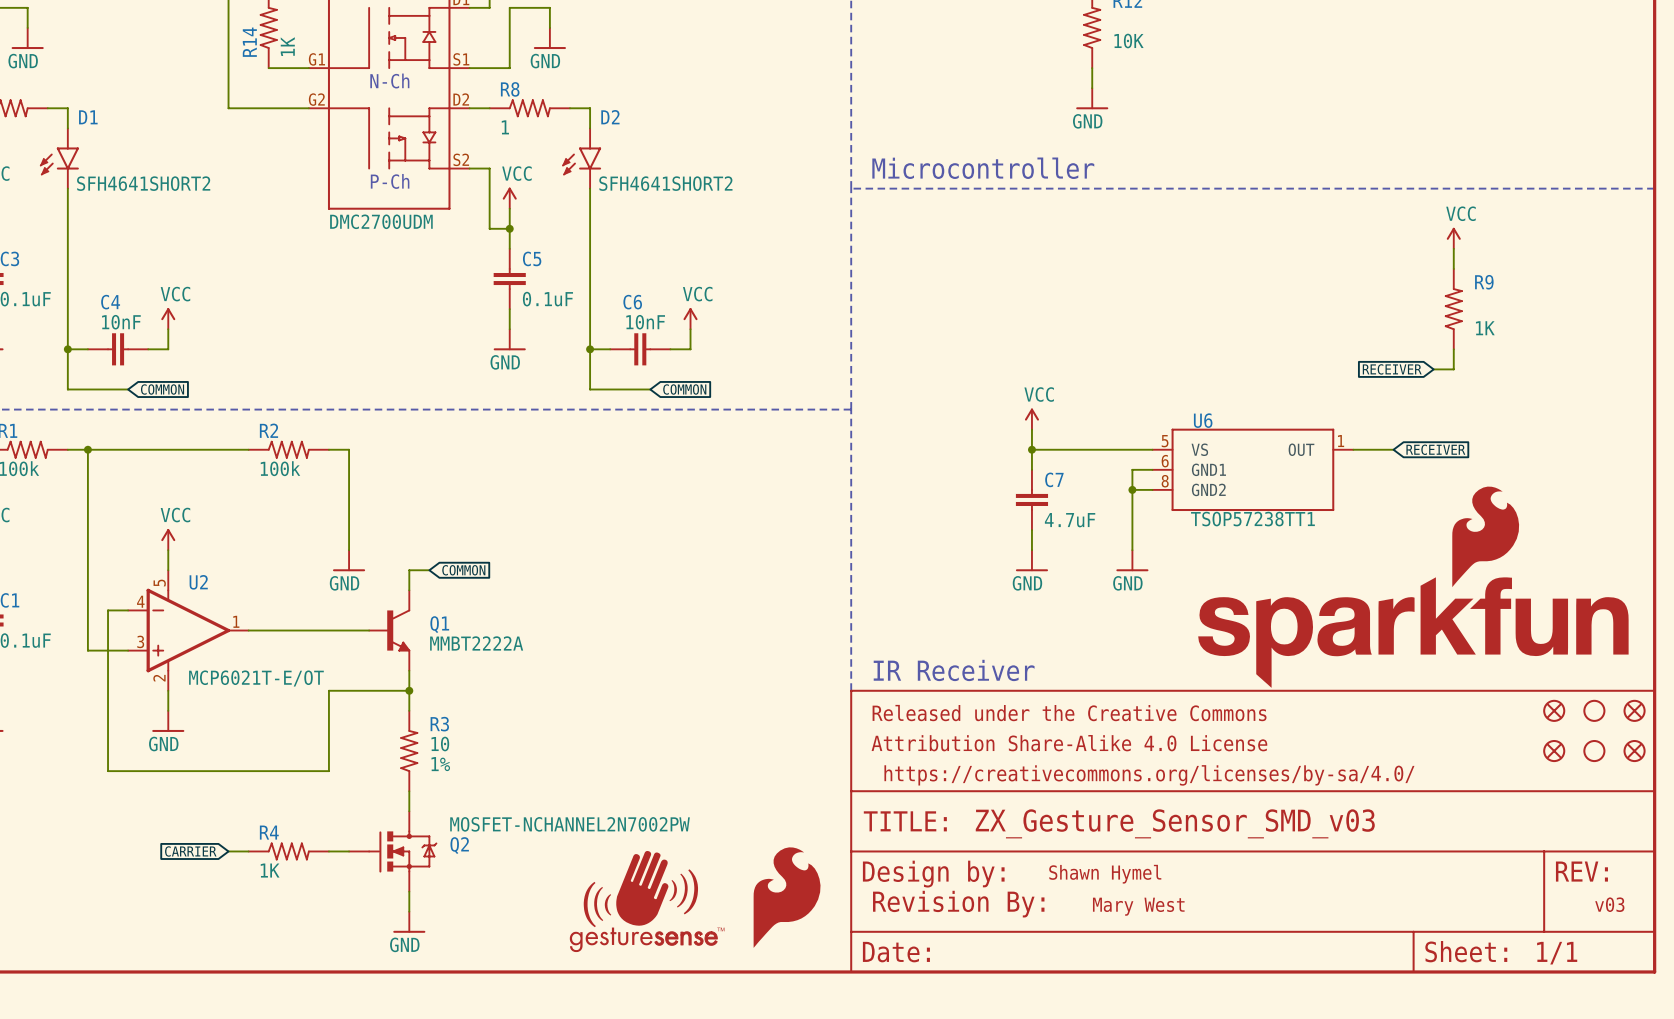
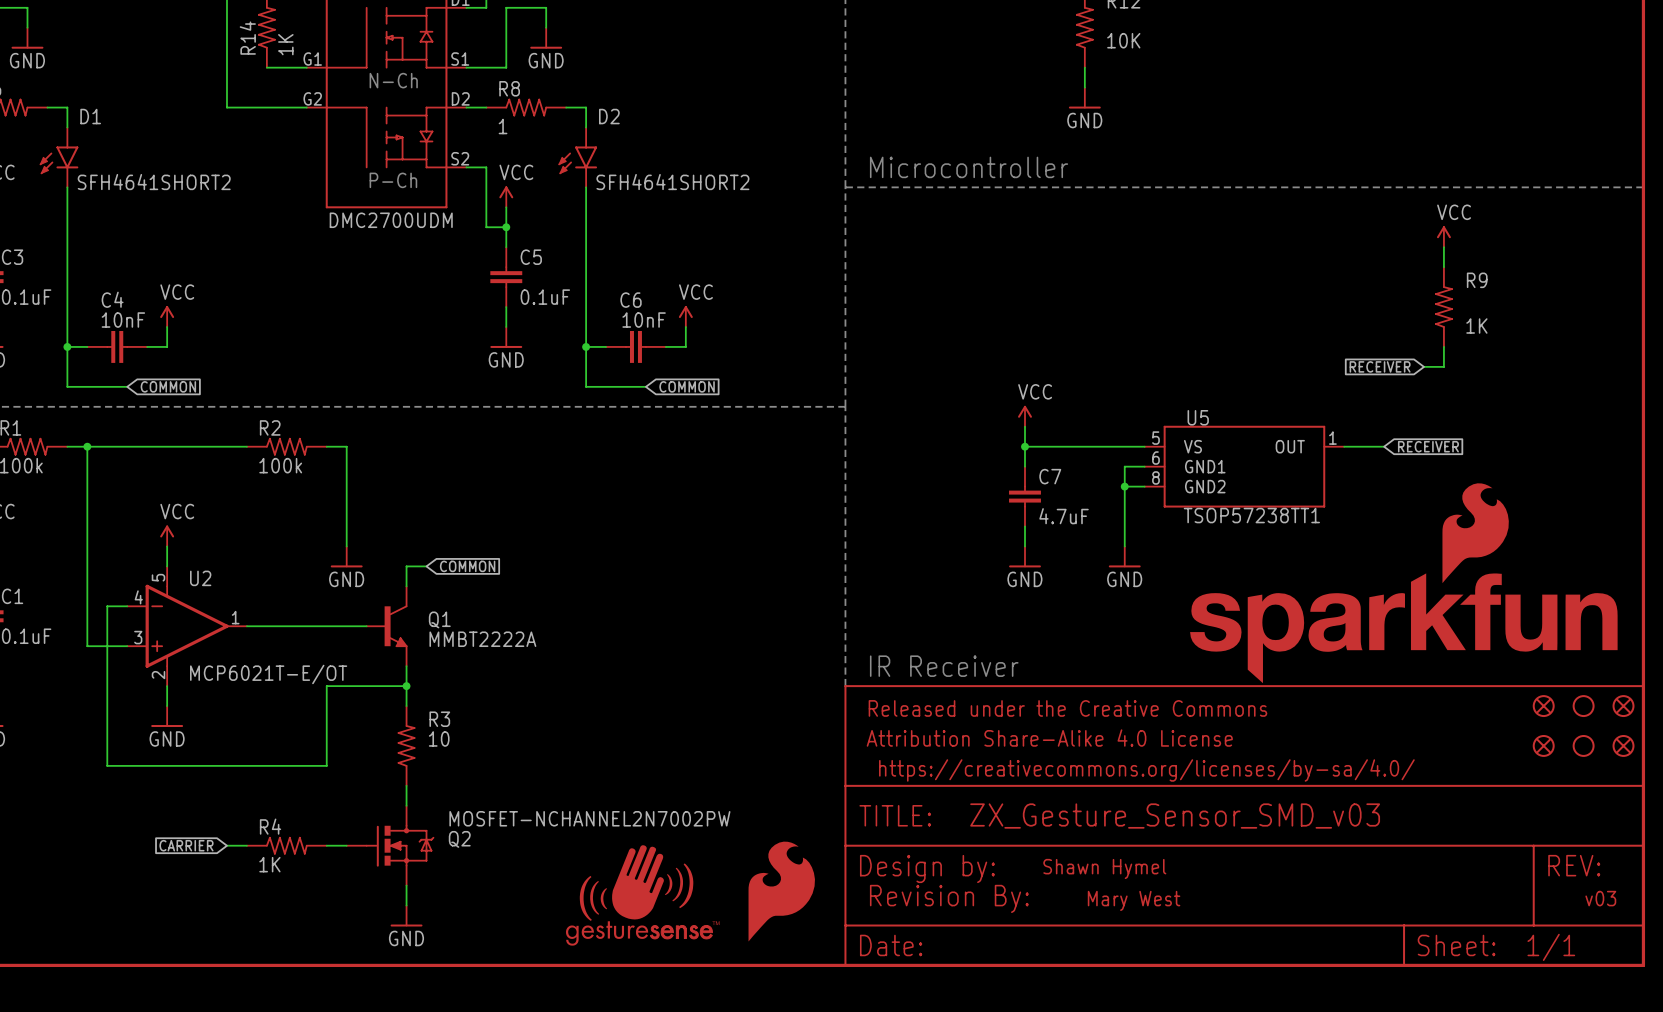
U6 name: U6 (1203, 420) -> U5 (1198, 417)
R3 text: 1% (440, 764) -> none

